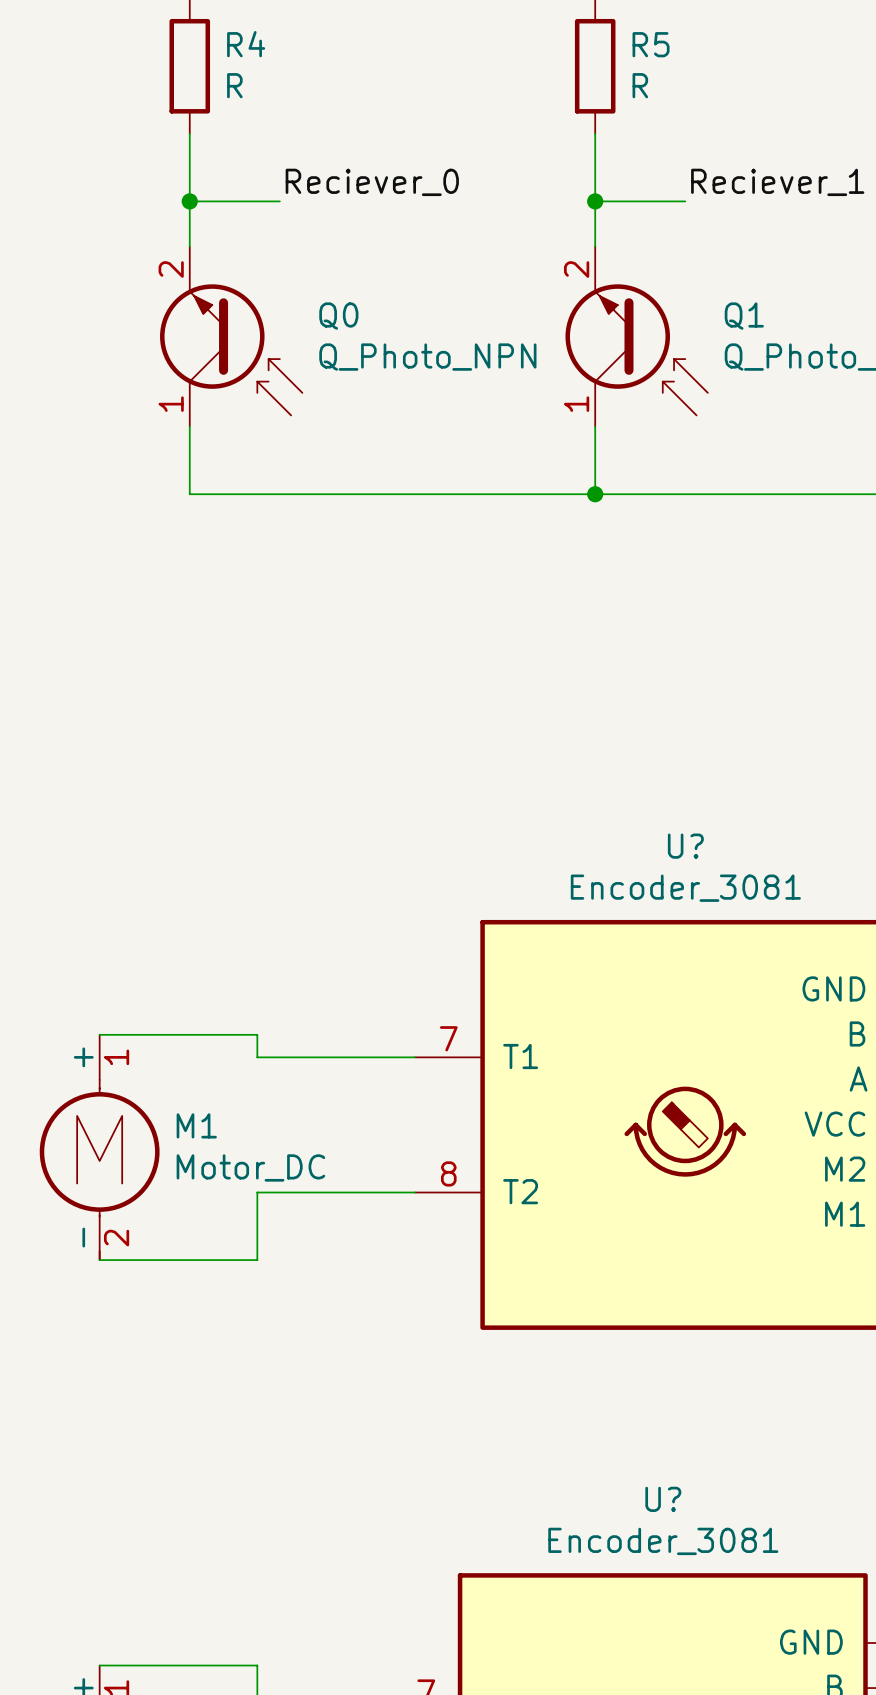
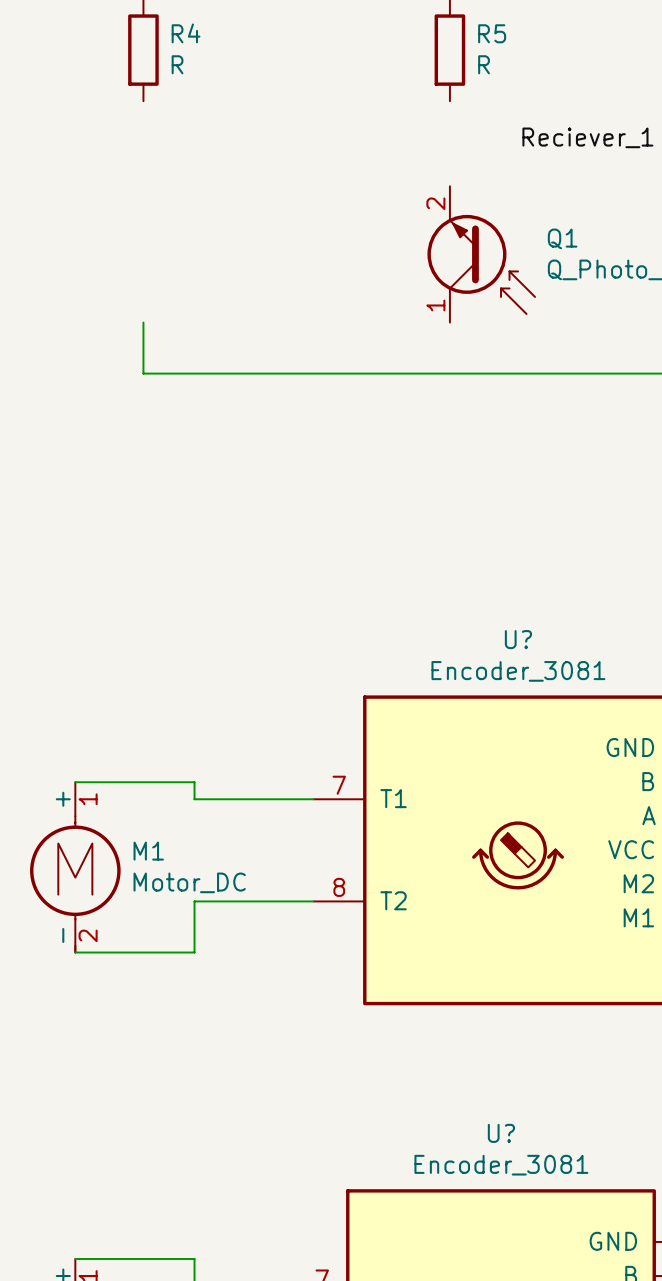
wire: (189, 133) (189, 246) -> none
wire: (595, 133) (595, 246) -> none
label: Reciever_0 (372, 182) -> none
wire: (189, 201) (279, 201) -> none
junction: (189, 201) -> none
wire: (595, 201) (685, 201) -> none
junction: (595, 201) -> none
Q0: Q_Photo_NPN (231, 336) -> none
wire: (595, 426) (595, 494) -> none
junction: (595, 494) -> none

